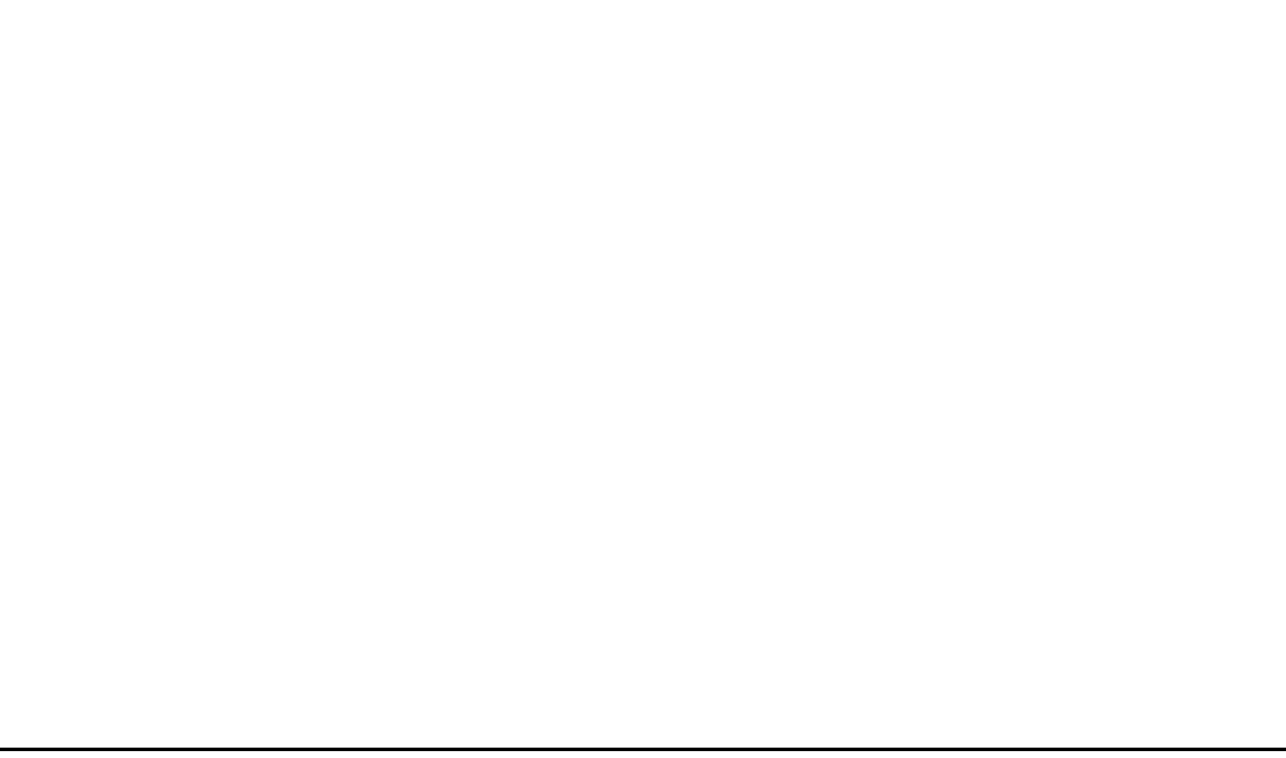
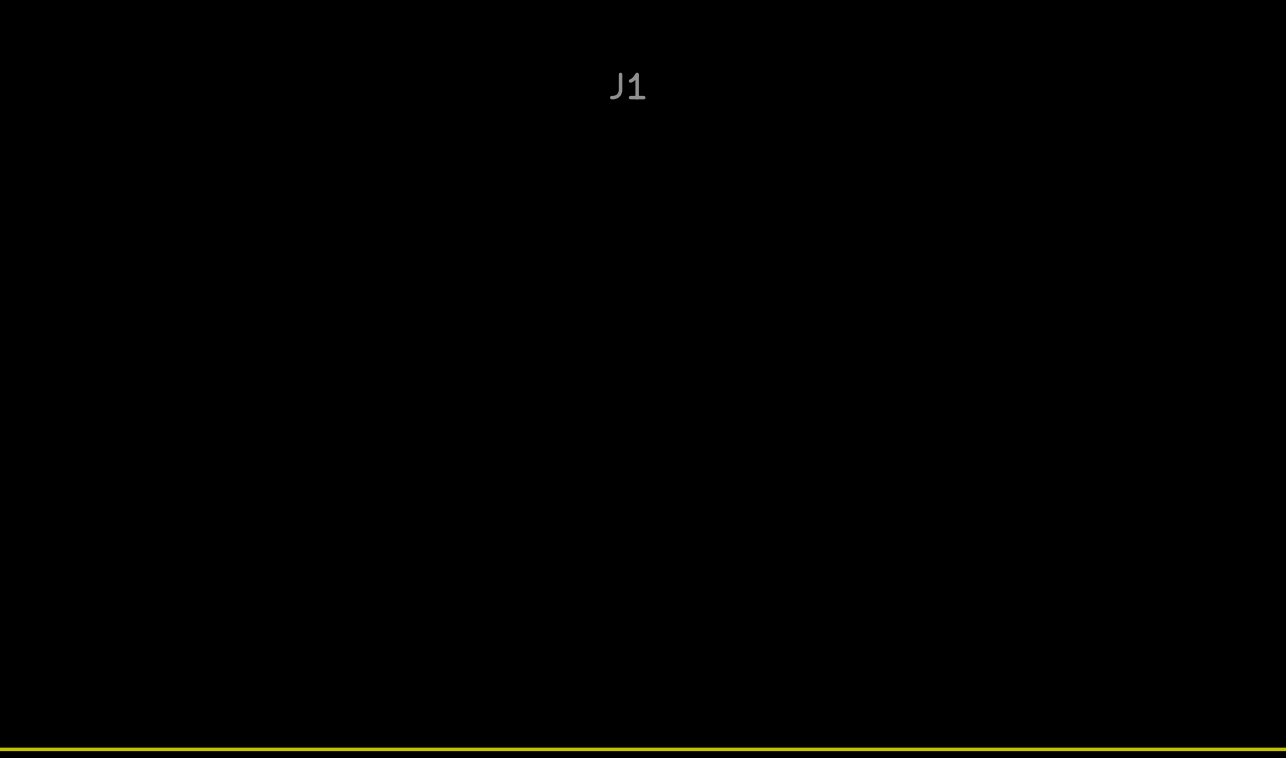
text: none -> J1 (627, 85)

